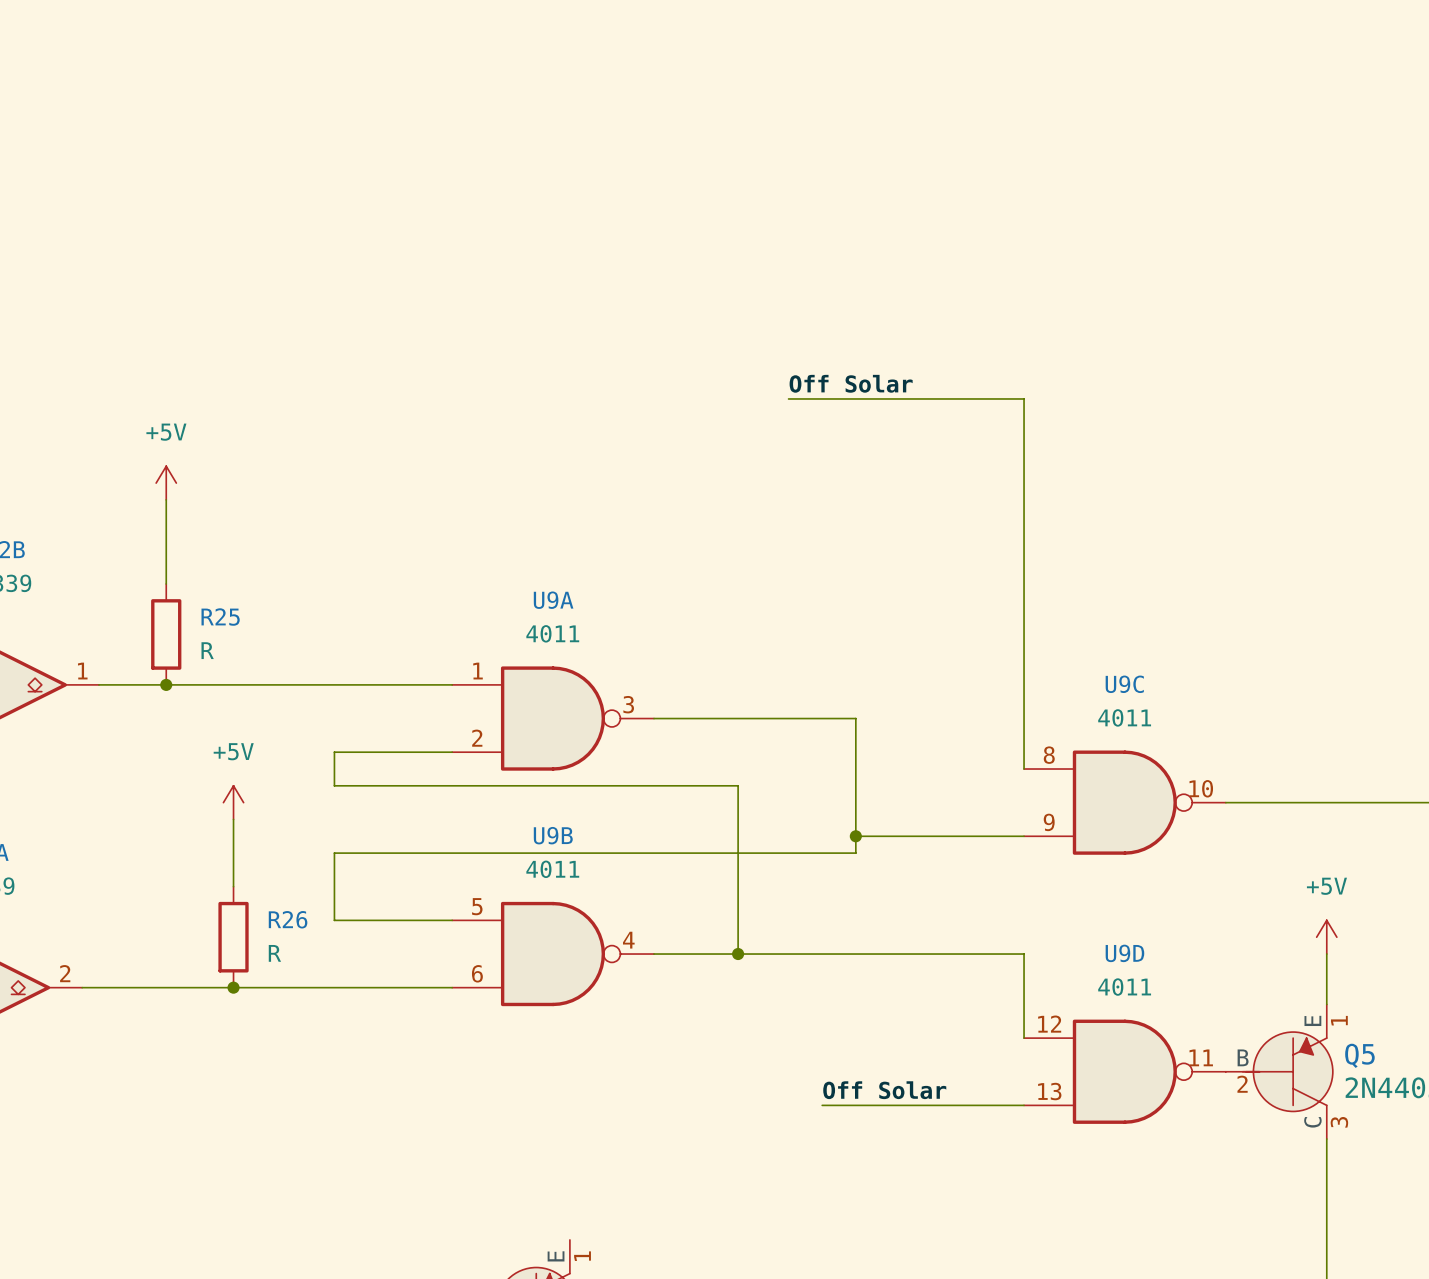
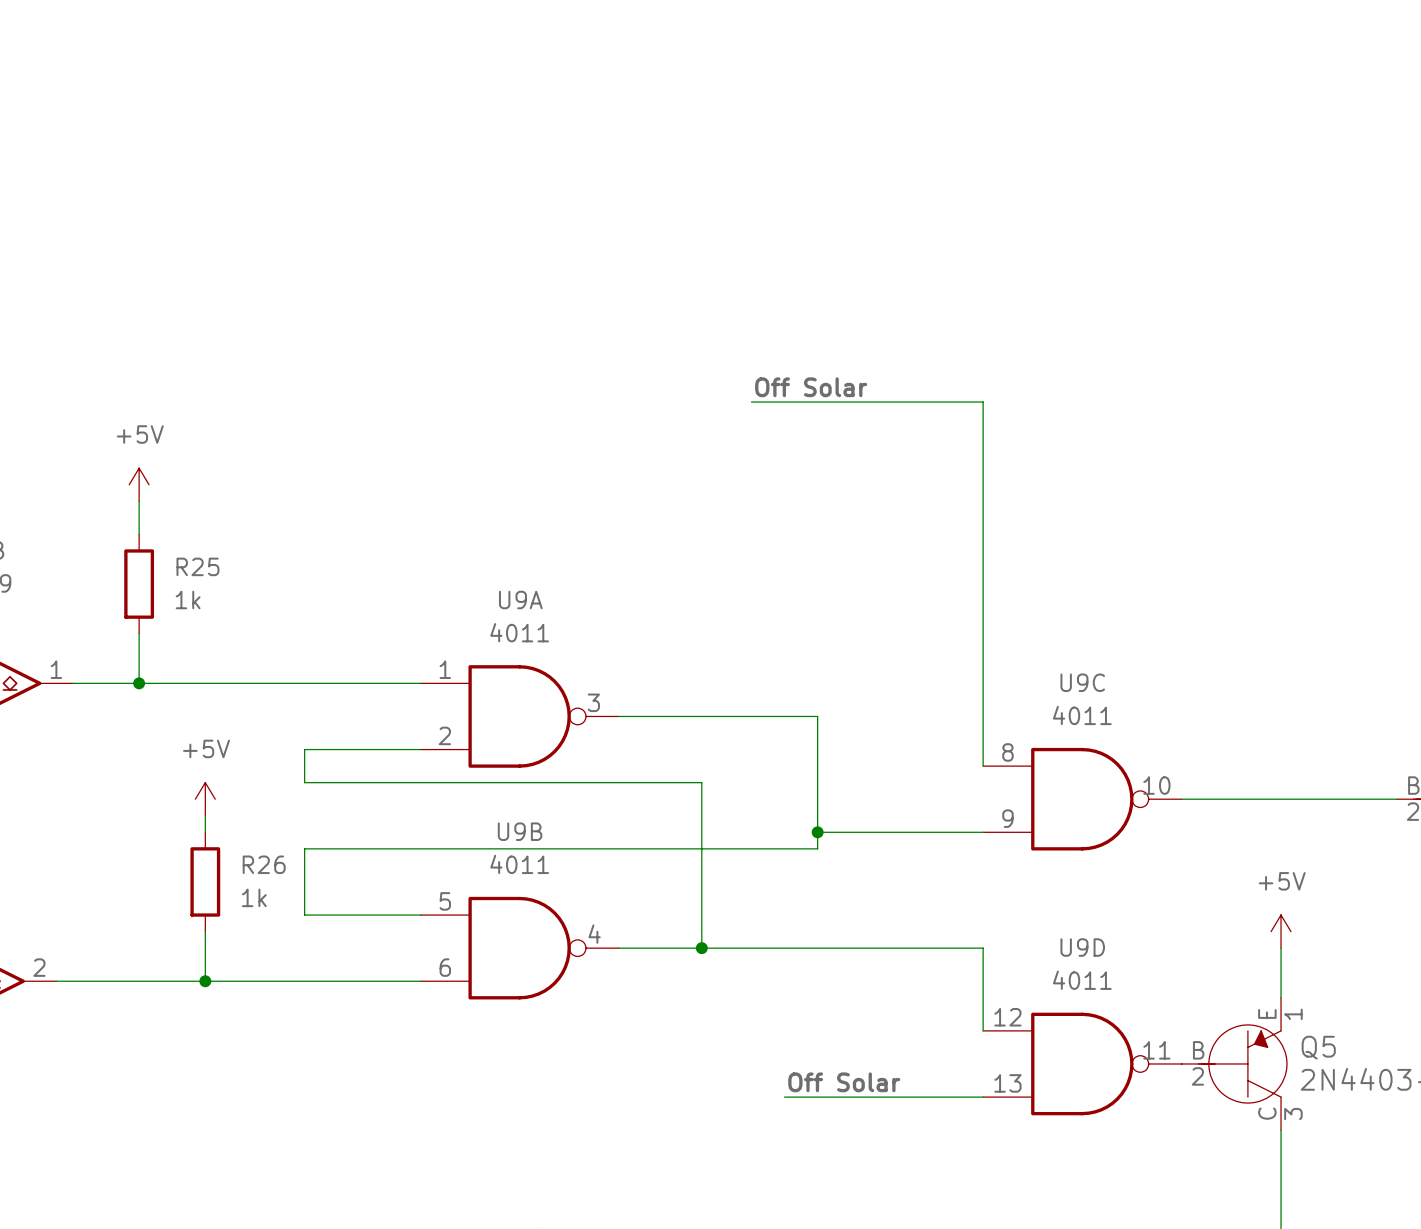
wire: (166, 533) (166, 583) -> (139, 633) (139, 683)
R25 position: (166, 634) -> (139, 584)
R25 value: R (207, 650) -> 1k (188, 599)
wire: (233, 836) (233, 886) -> (205, 931) (205, 981)
R26 position: (233, 937) -> (205, 881)
R26 value: R (274, 953) -> 1k (254, 897)

